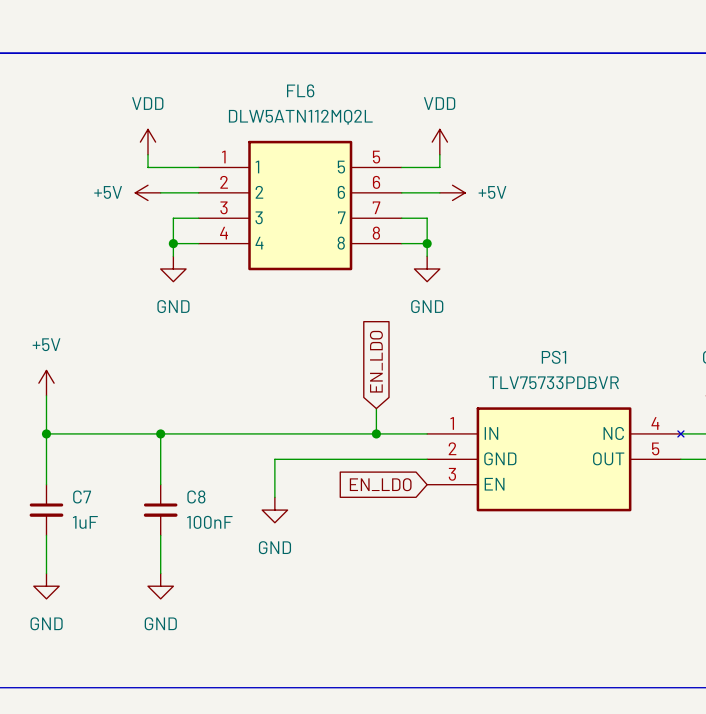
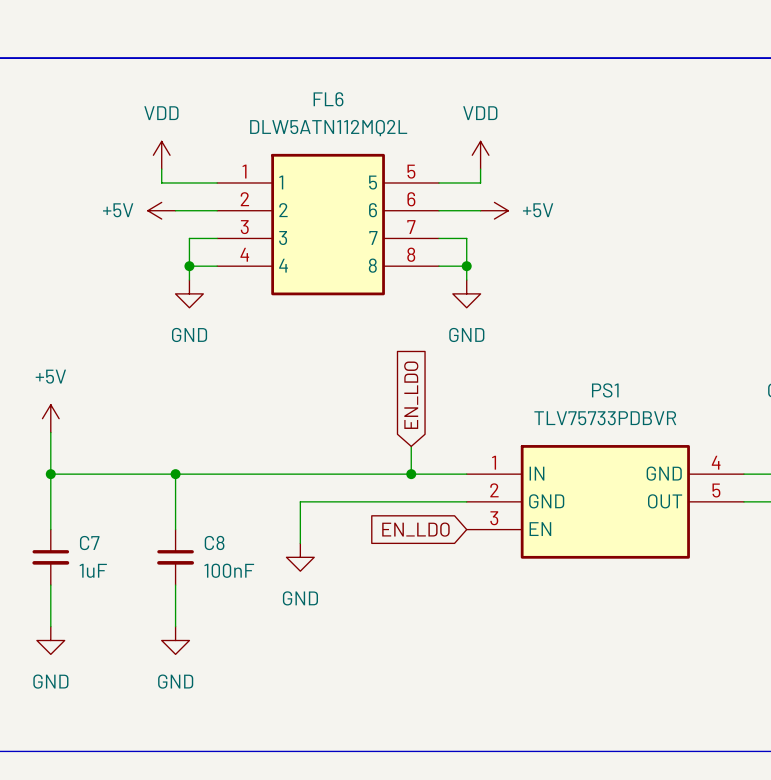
PS1 symbol: [427, 407, 684, 512] -> [466, 445, 744, 559]

